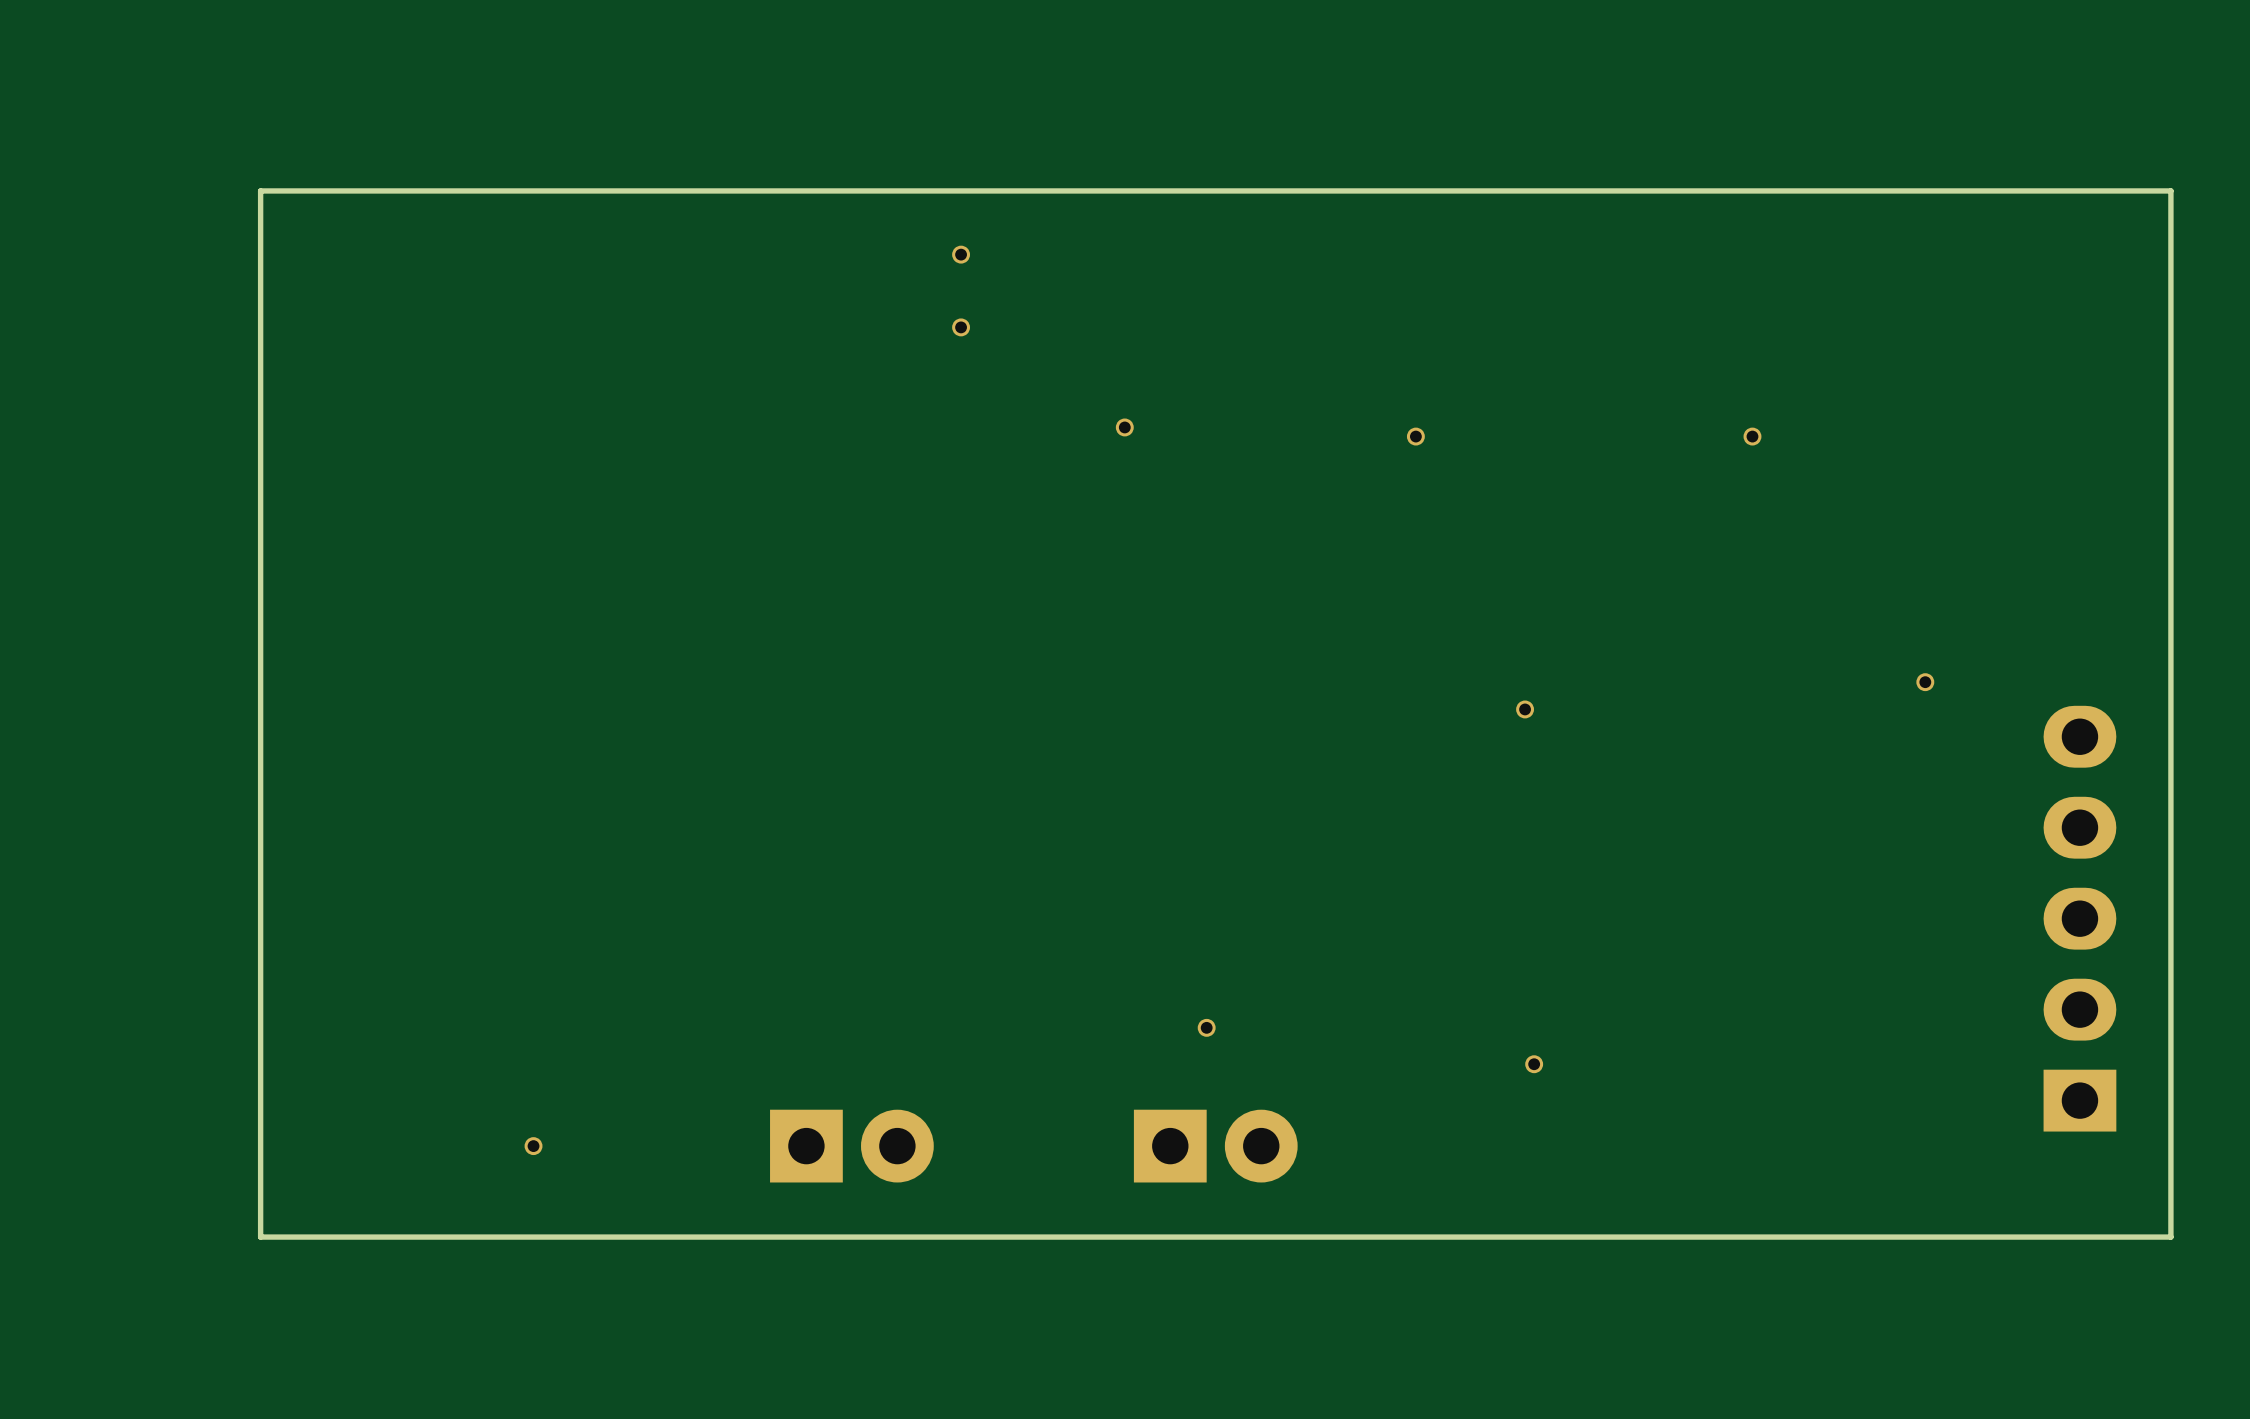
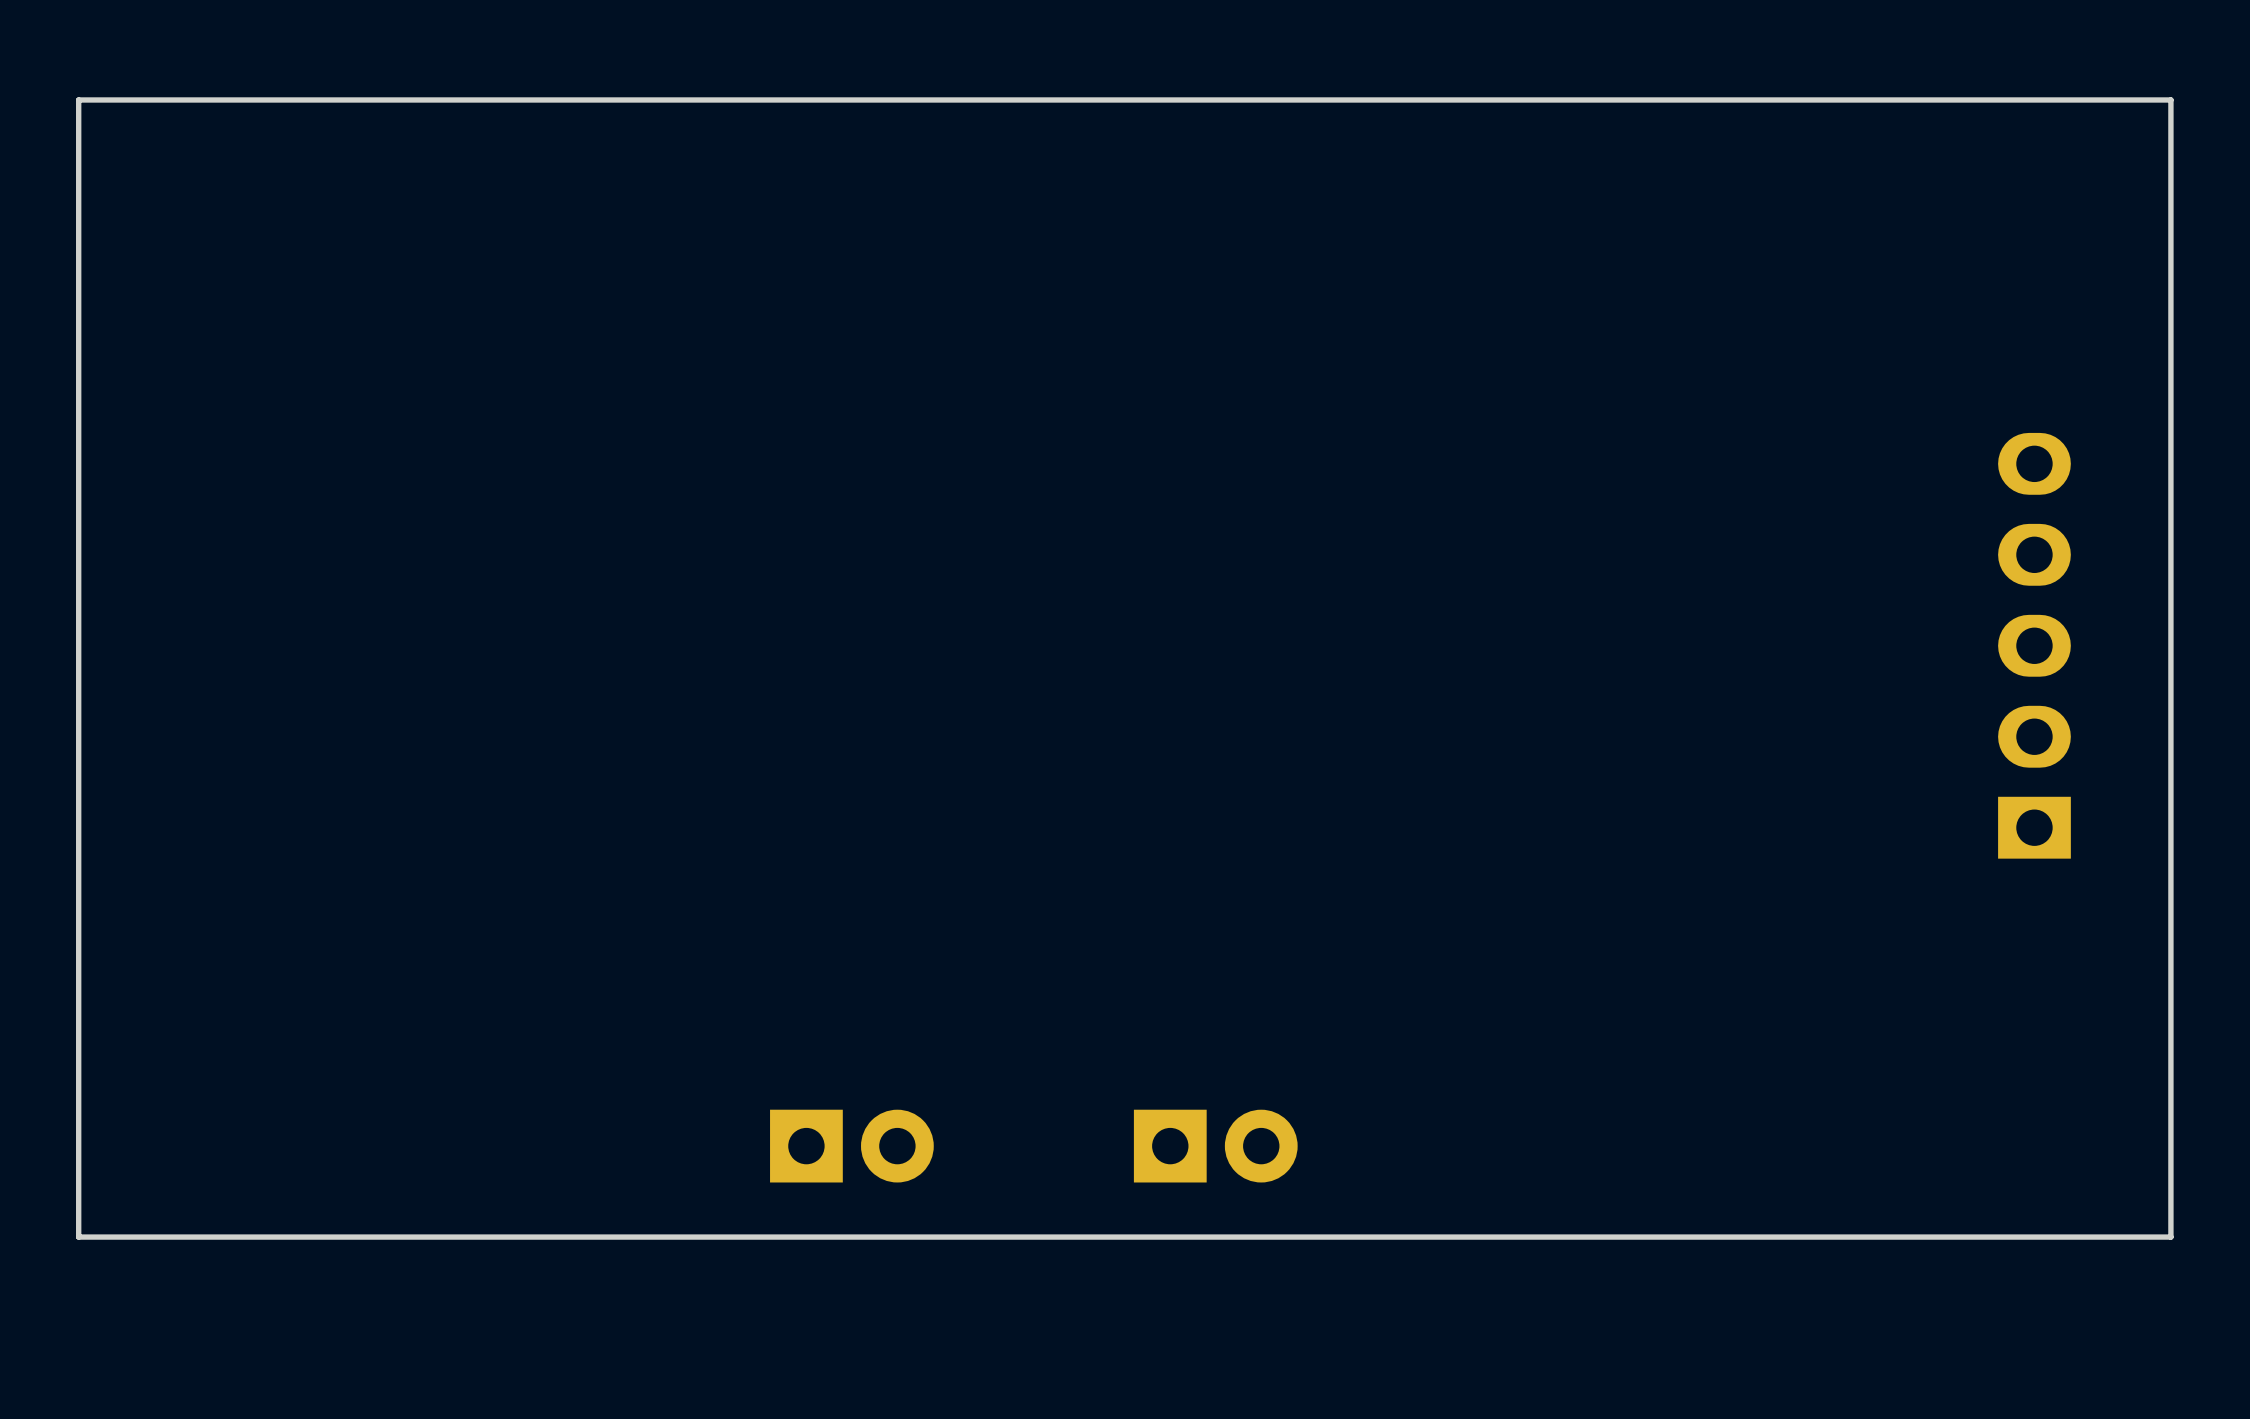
board edge: (2170, 190) (260, 190) (260, 1237) -> (2170, 190) (2170, 99) (78, 99) (78, 1237) (260, 1237)
part: (961, 254) -> none
part: (961, 327) -> none
part: (1124, 427) -> none
part: (1415, 436) -> none
part: (1752, 436) -> none
part: (1925, 682) -> none
part: (1525, 709) -> none
part position: (2079, 918) -> (2034, 645)
part: (1206, 1027) -> none
part: (1534, 1064) -> none
part: (533, 1146) -> none

